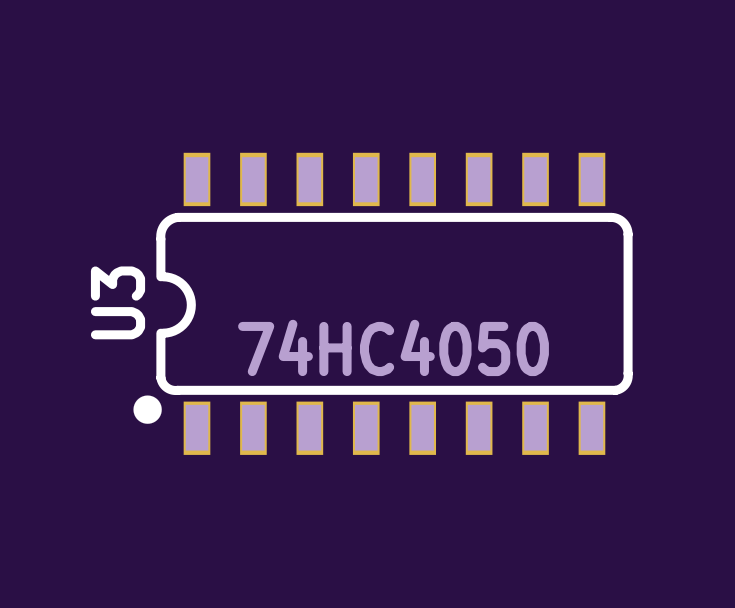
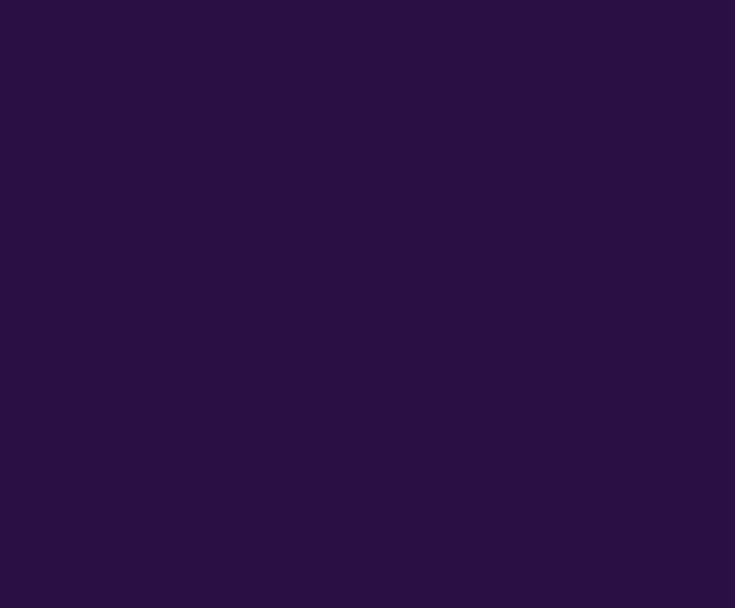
U3: 74HC4050 (383, 303) -> none

